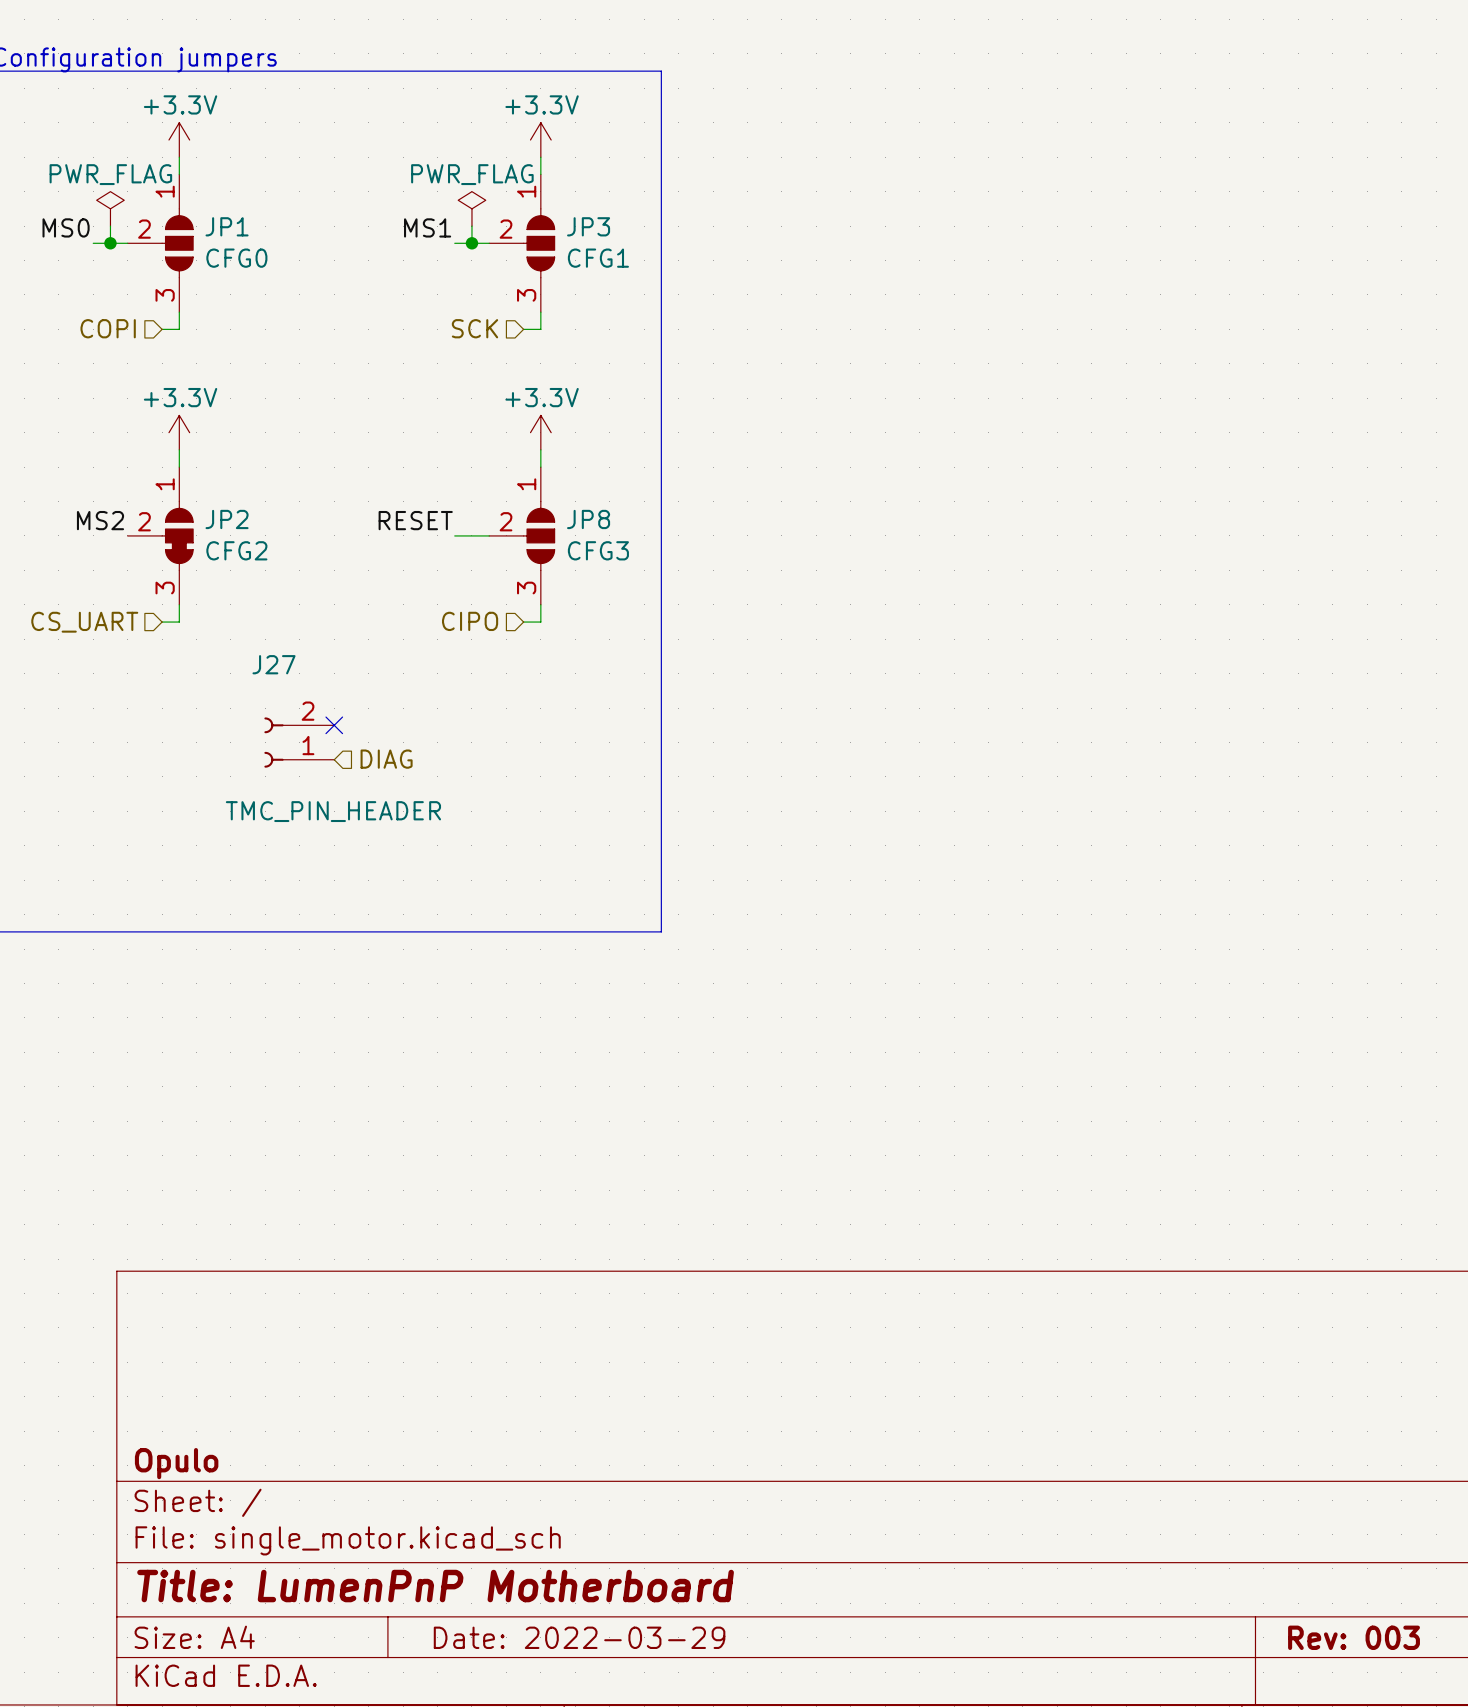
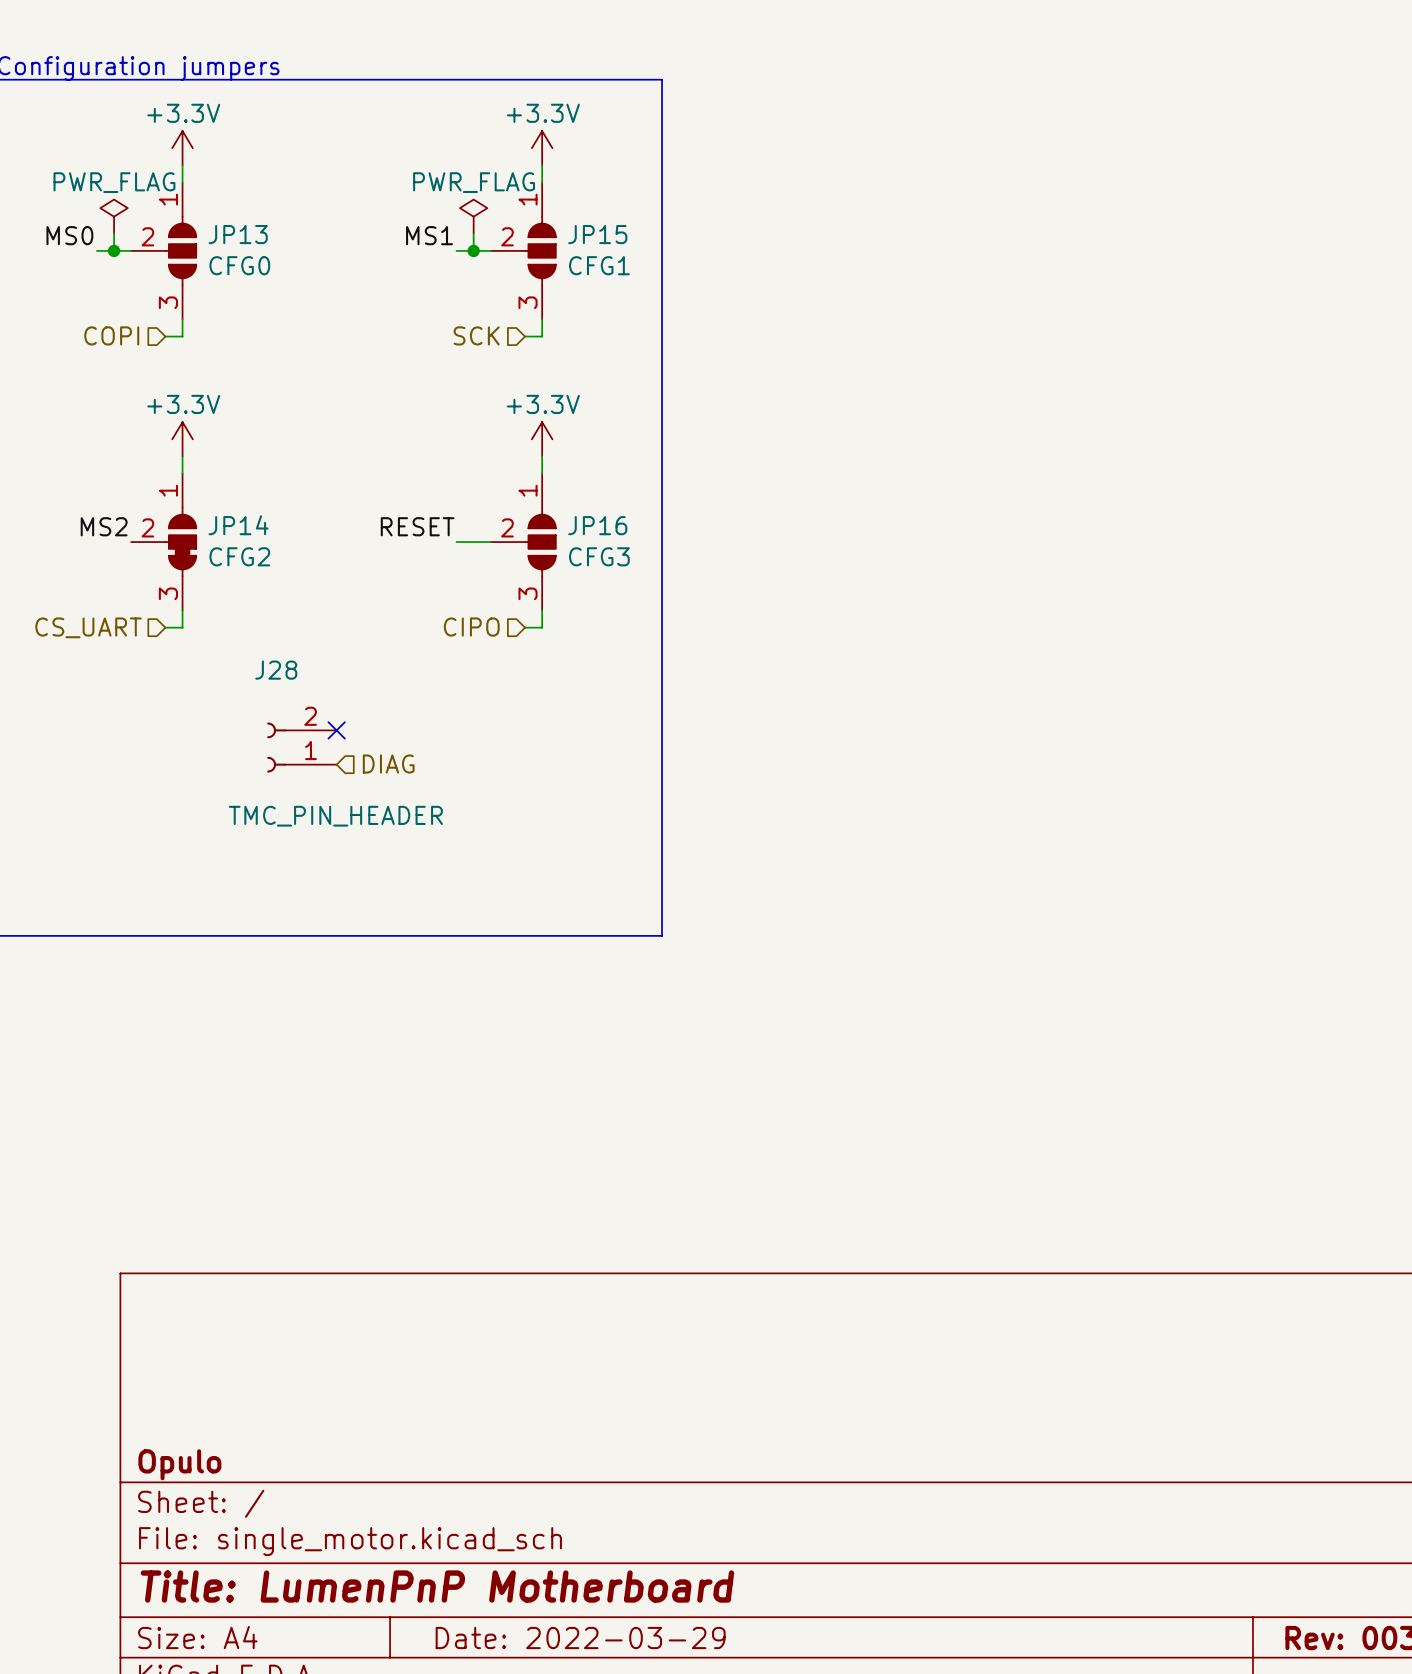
JP1 name: JP1 (227, 226) -> JP13 (238, 234)
JP3 name: JP3 (588, 226) -> JP15 (597, 234)
JP2 name: JP2 (227, 519) -> JP14 (238, 525)
JP8 name: JP8 (588, 519) -> JP16 (597, 525)
J27 name: J27 (274, 664) -> J28 (276, 670)

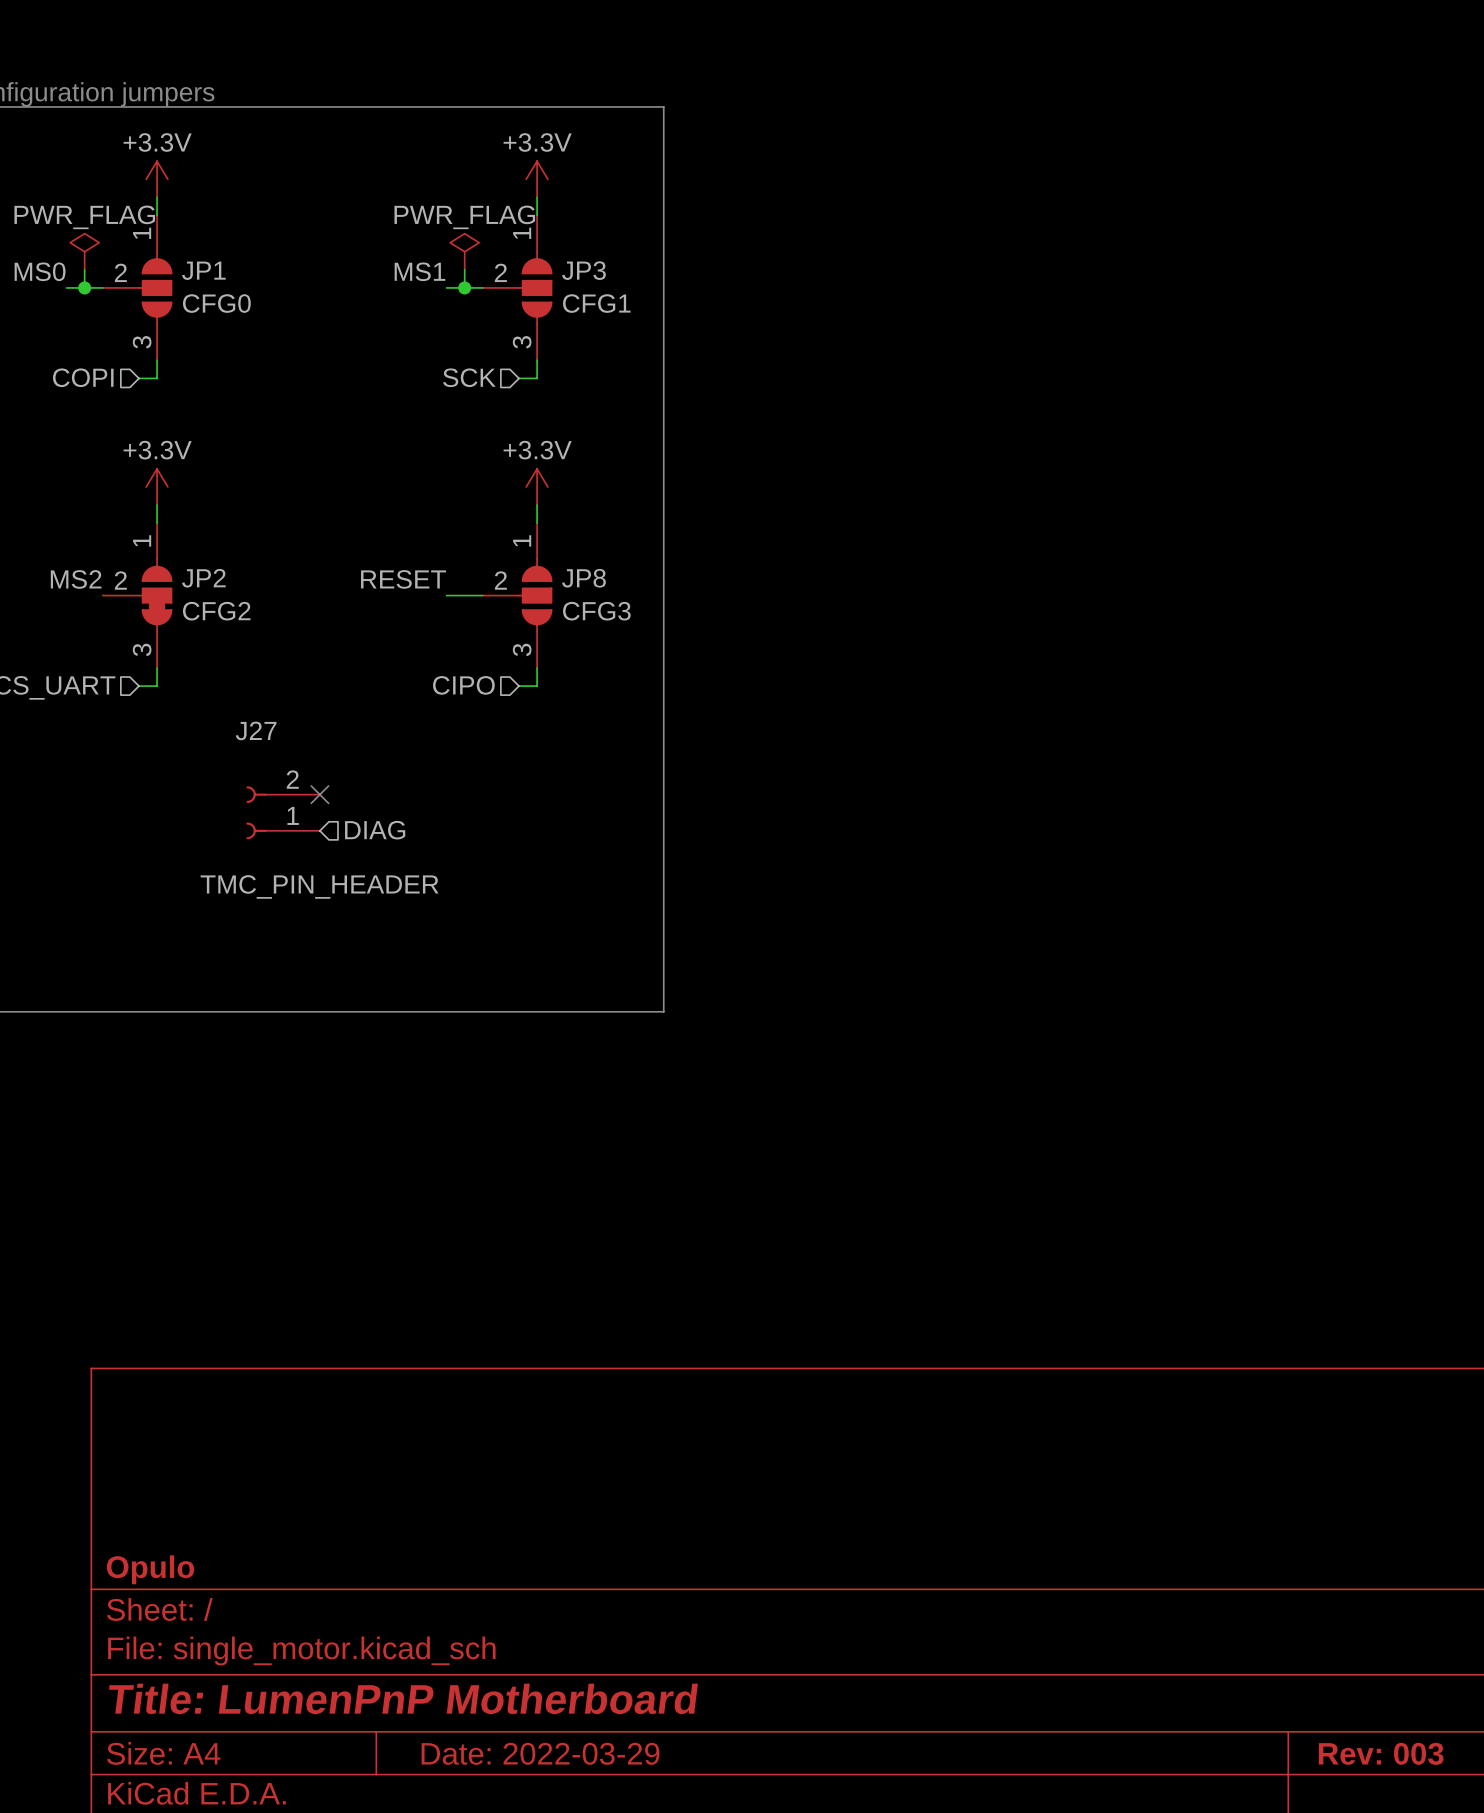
JP13 name: JP13 (238, 234) -> JP1 (203, 270)
JP15 name: JP15 (597, 234) -> JP3 (583, 270)
JP14 name: JP14 (238, 525) -> JP2 (203, 578)
JP16 name: JP16 (597, 525) -> JP8 (583, 578)
J28 name: J28 (276, 670) -> J27 (256, 730)

